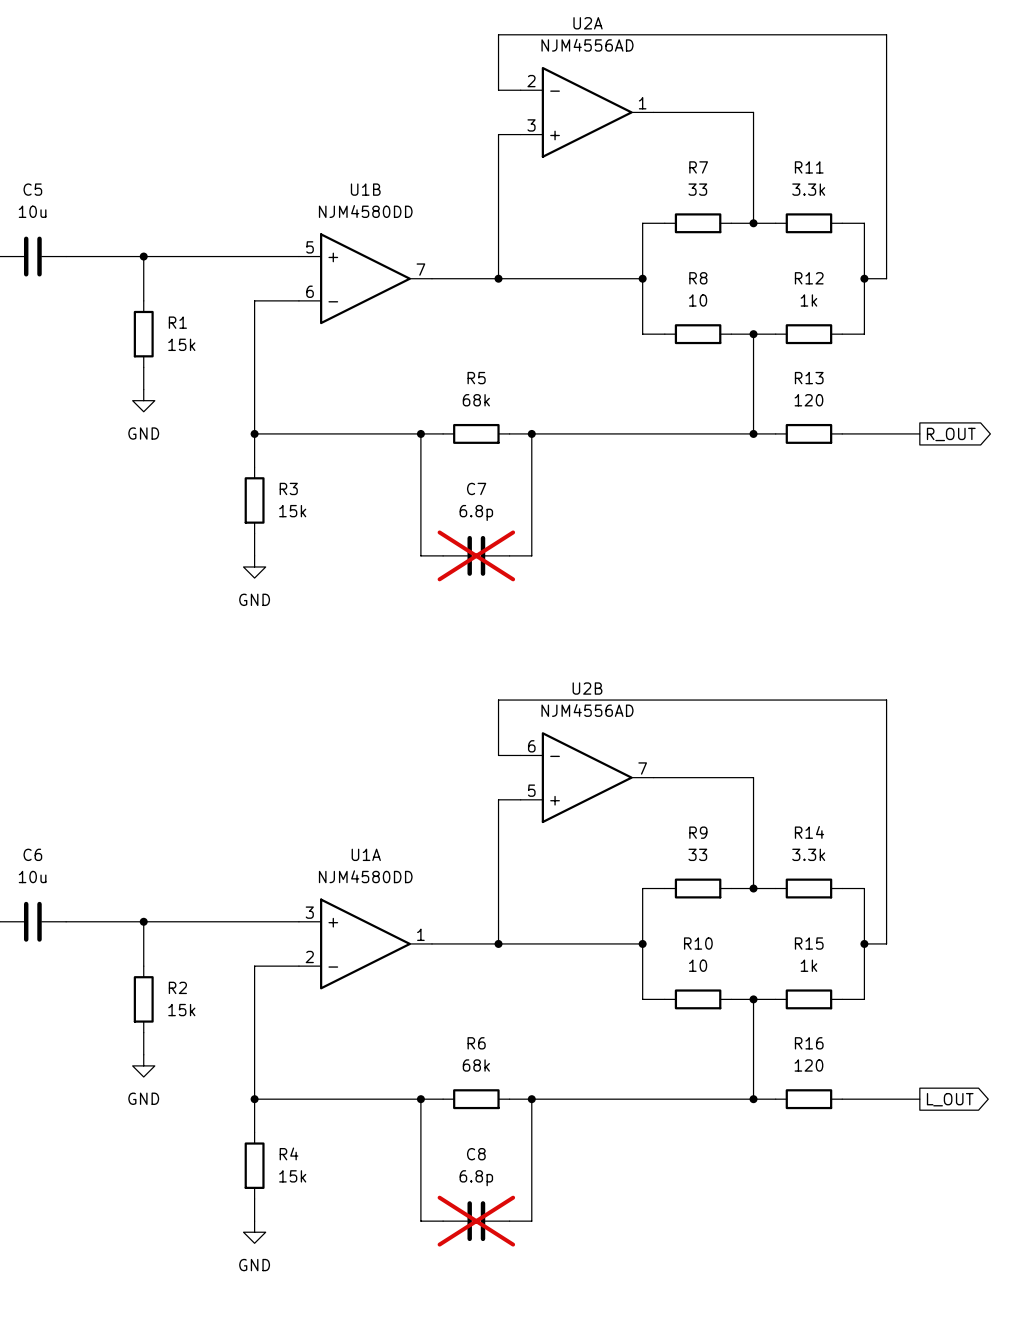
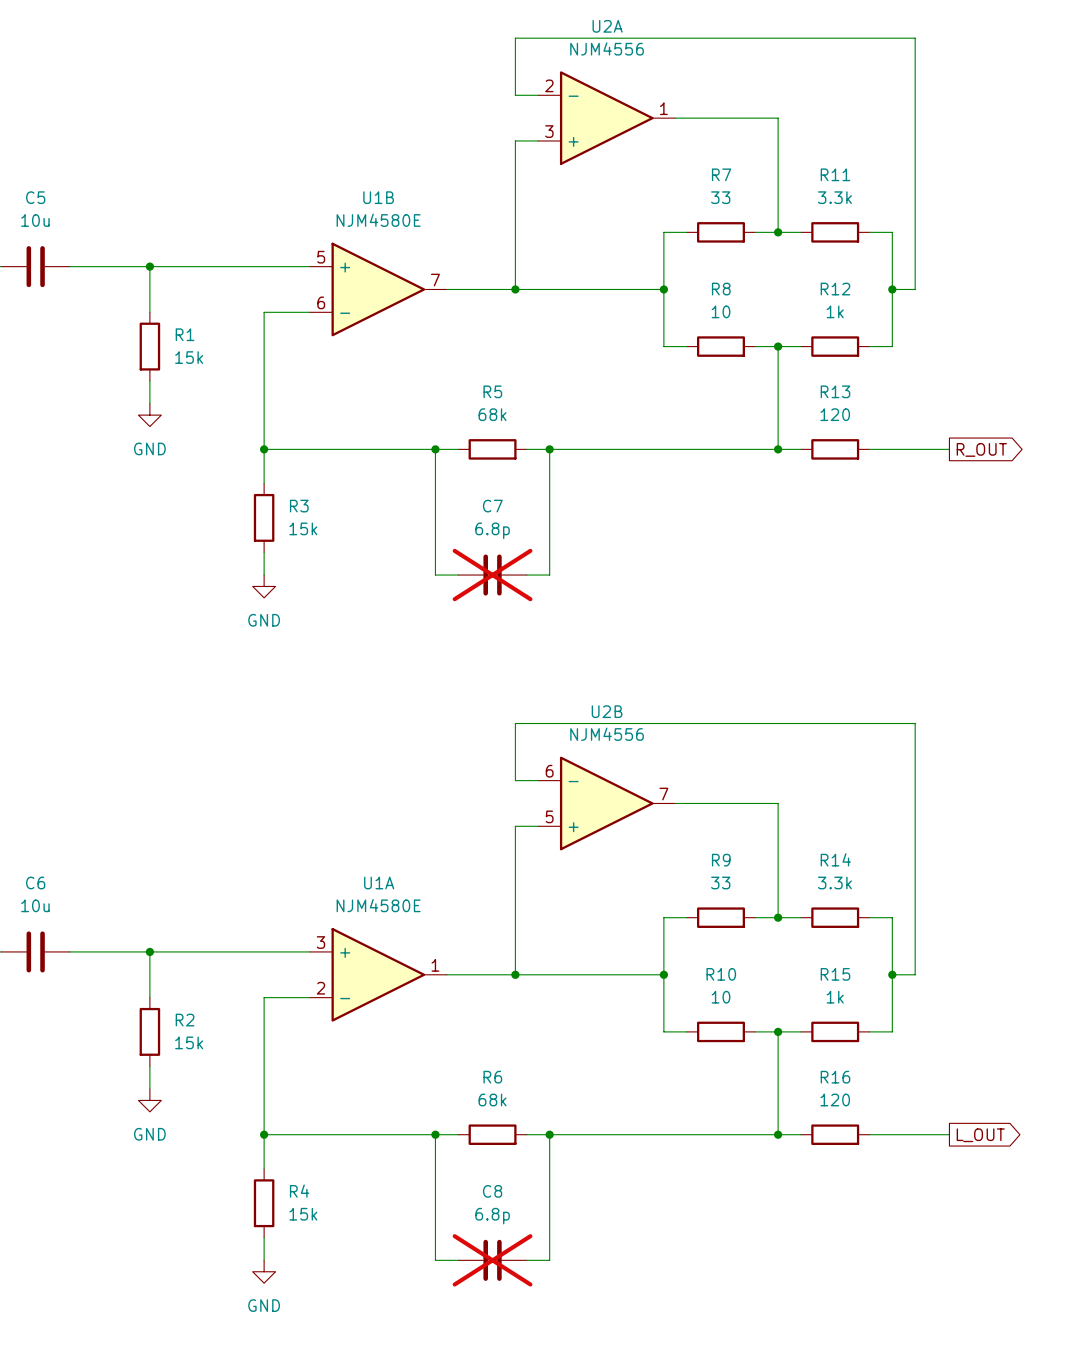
U2A value: NJM4556AD (587, 45) -> NJM4556 (607, 48)
U1B value: NJM4580DD (365, 211) -> NJM4580E (378, 220)
U2B value: NJM4556AD (587, 710) -> NJM4556 (607, 734)
U1A value: NJM4580DD (365, 876) -> NJM4580E (378, 905)

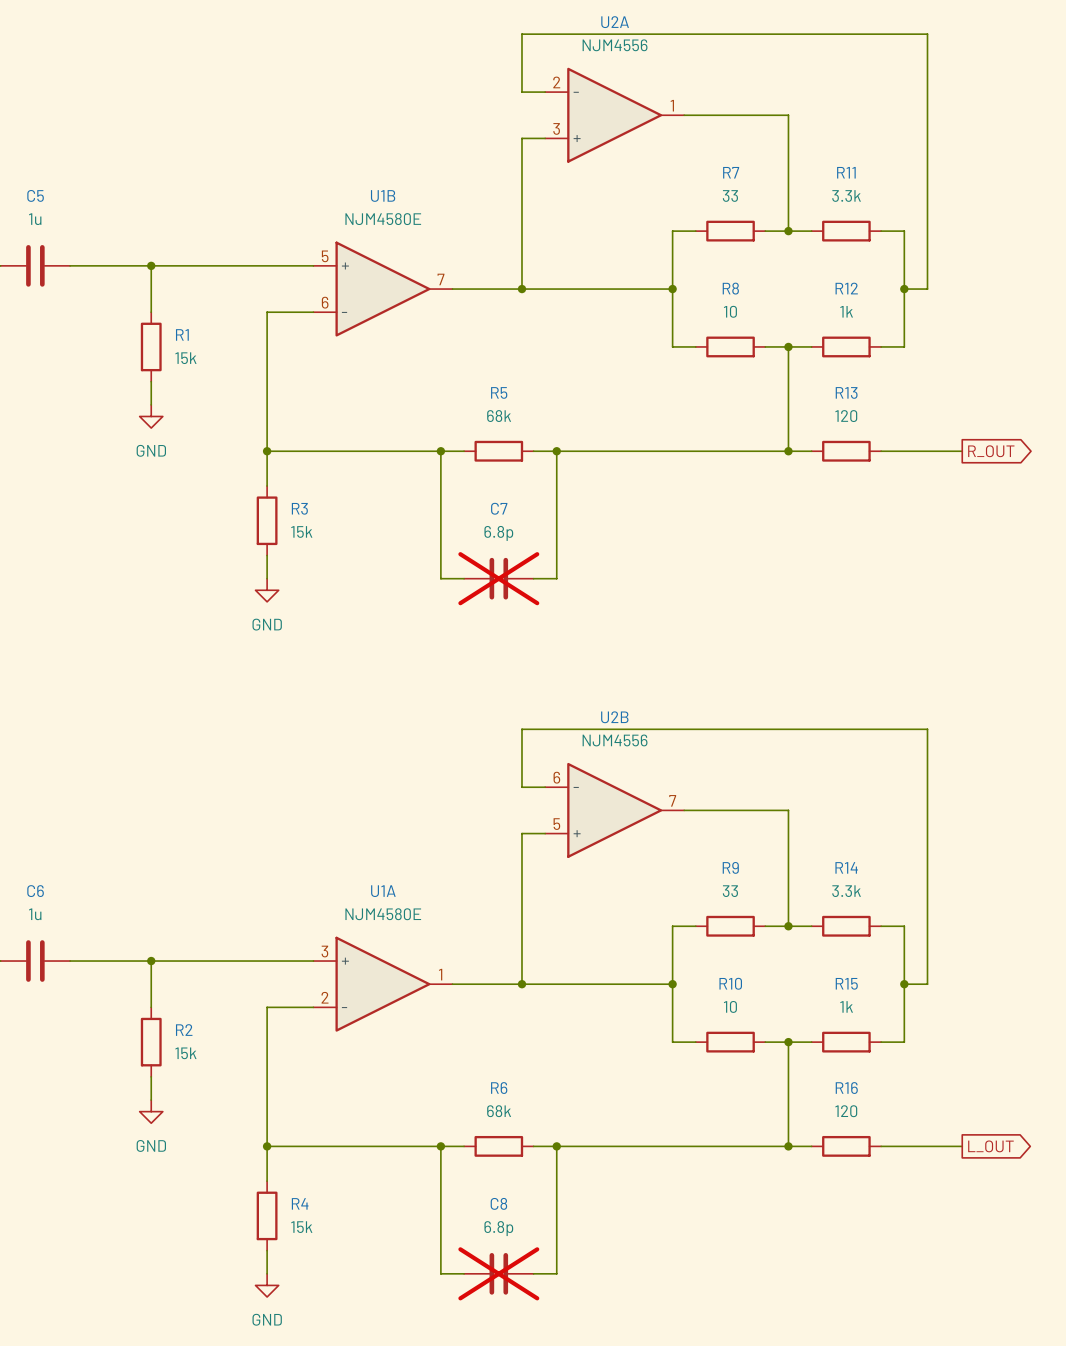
C5 value: 10u (35, 220) -> 1u (35, 219)
C6 value: 10u (35, 905) -> 1u (35, 914)

